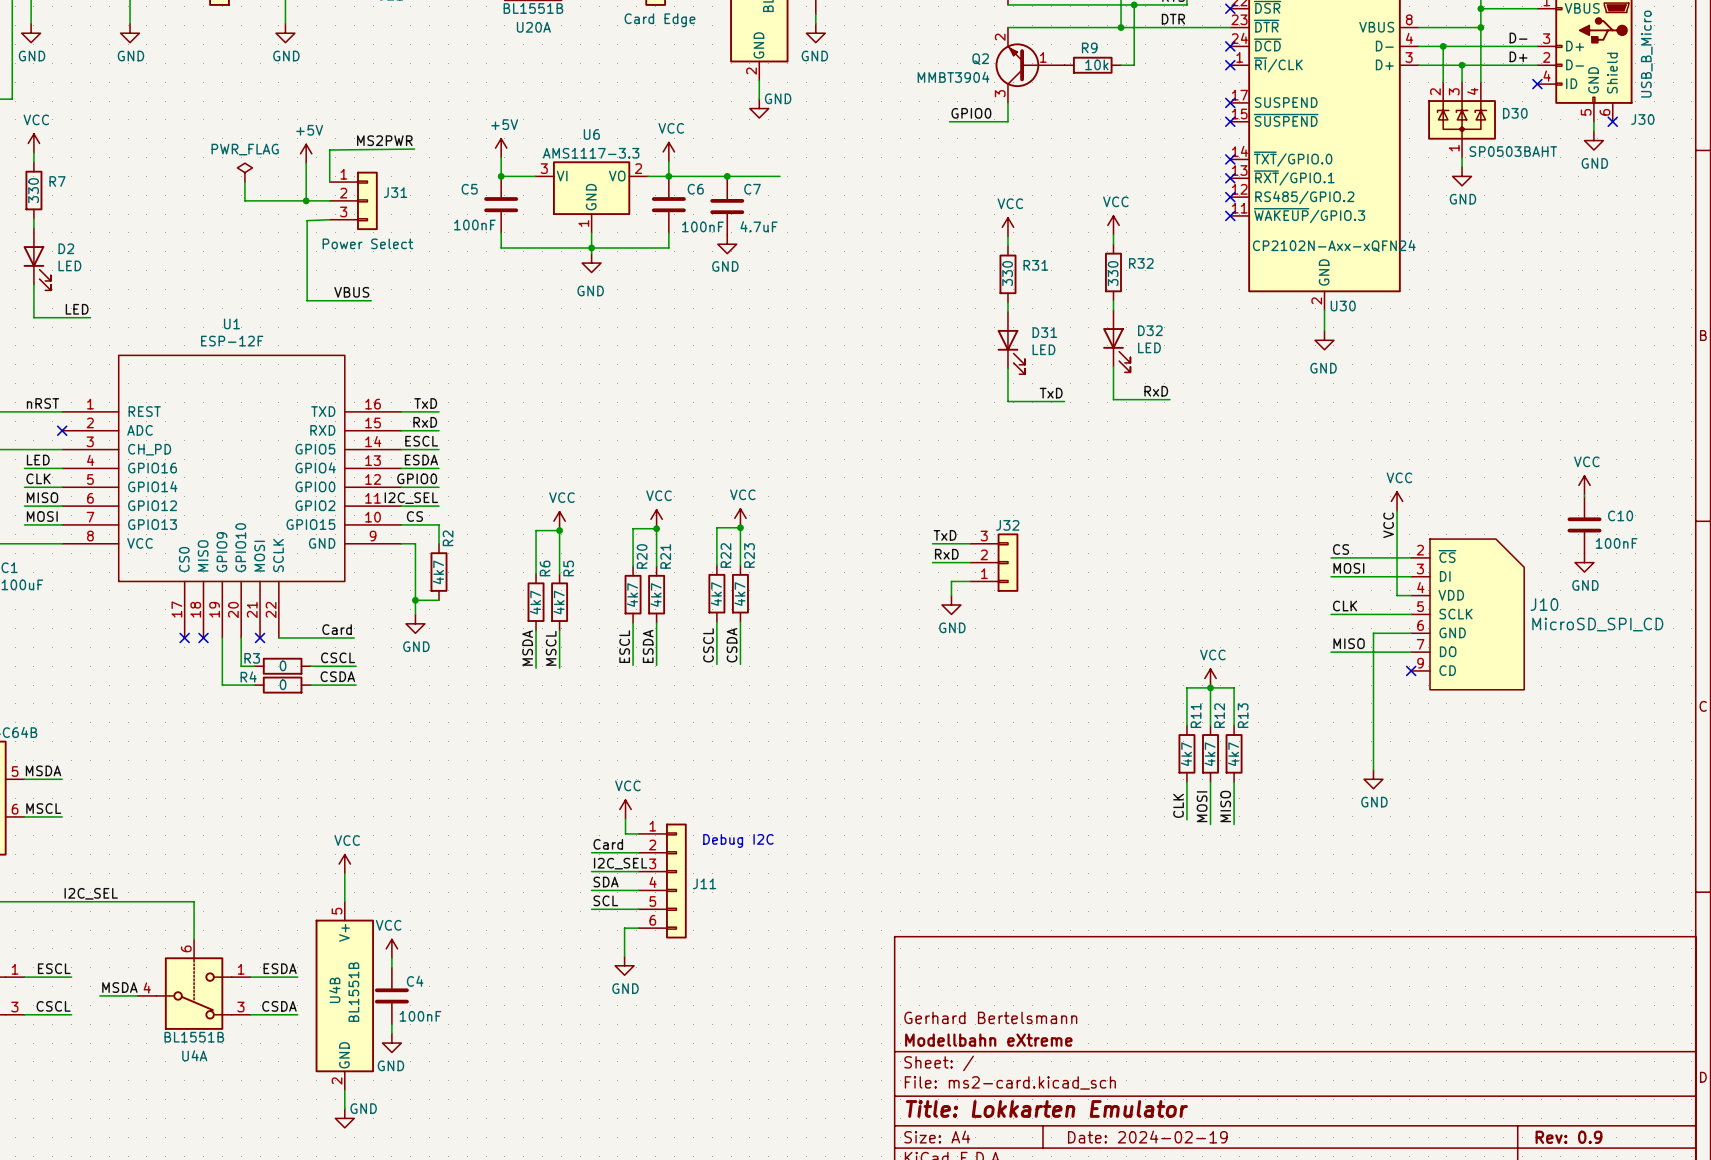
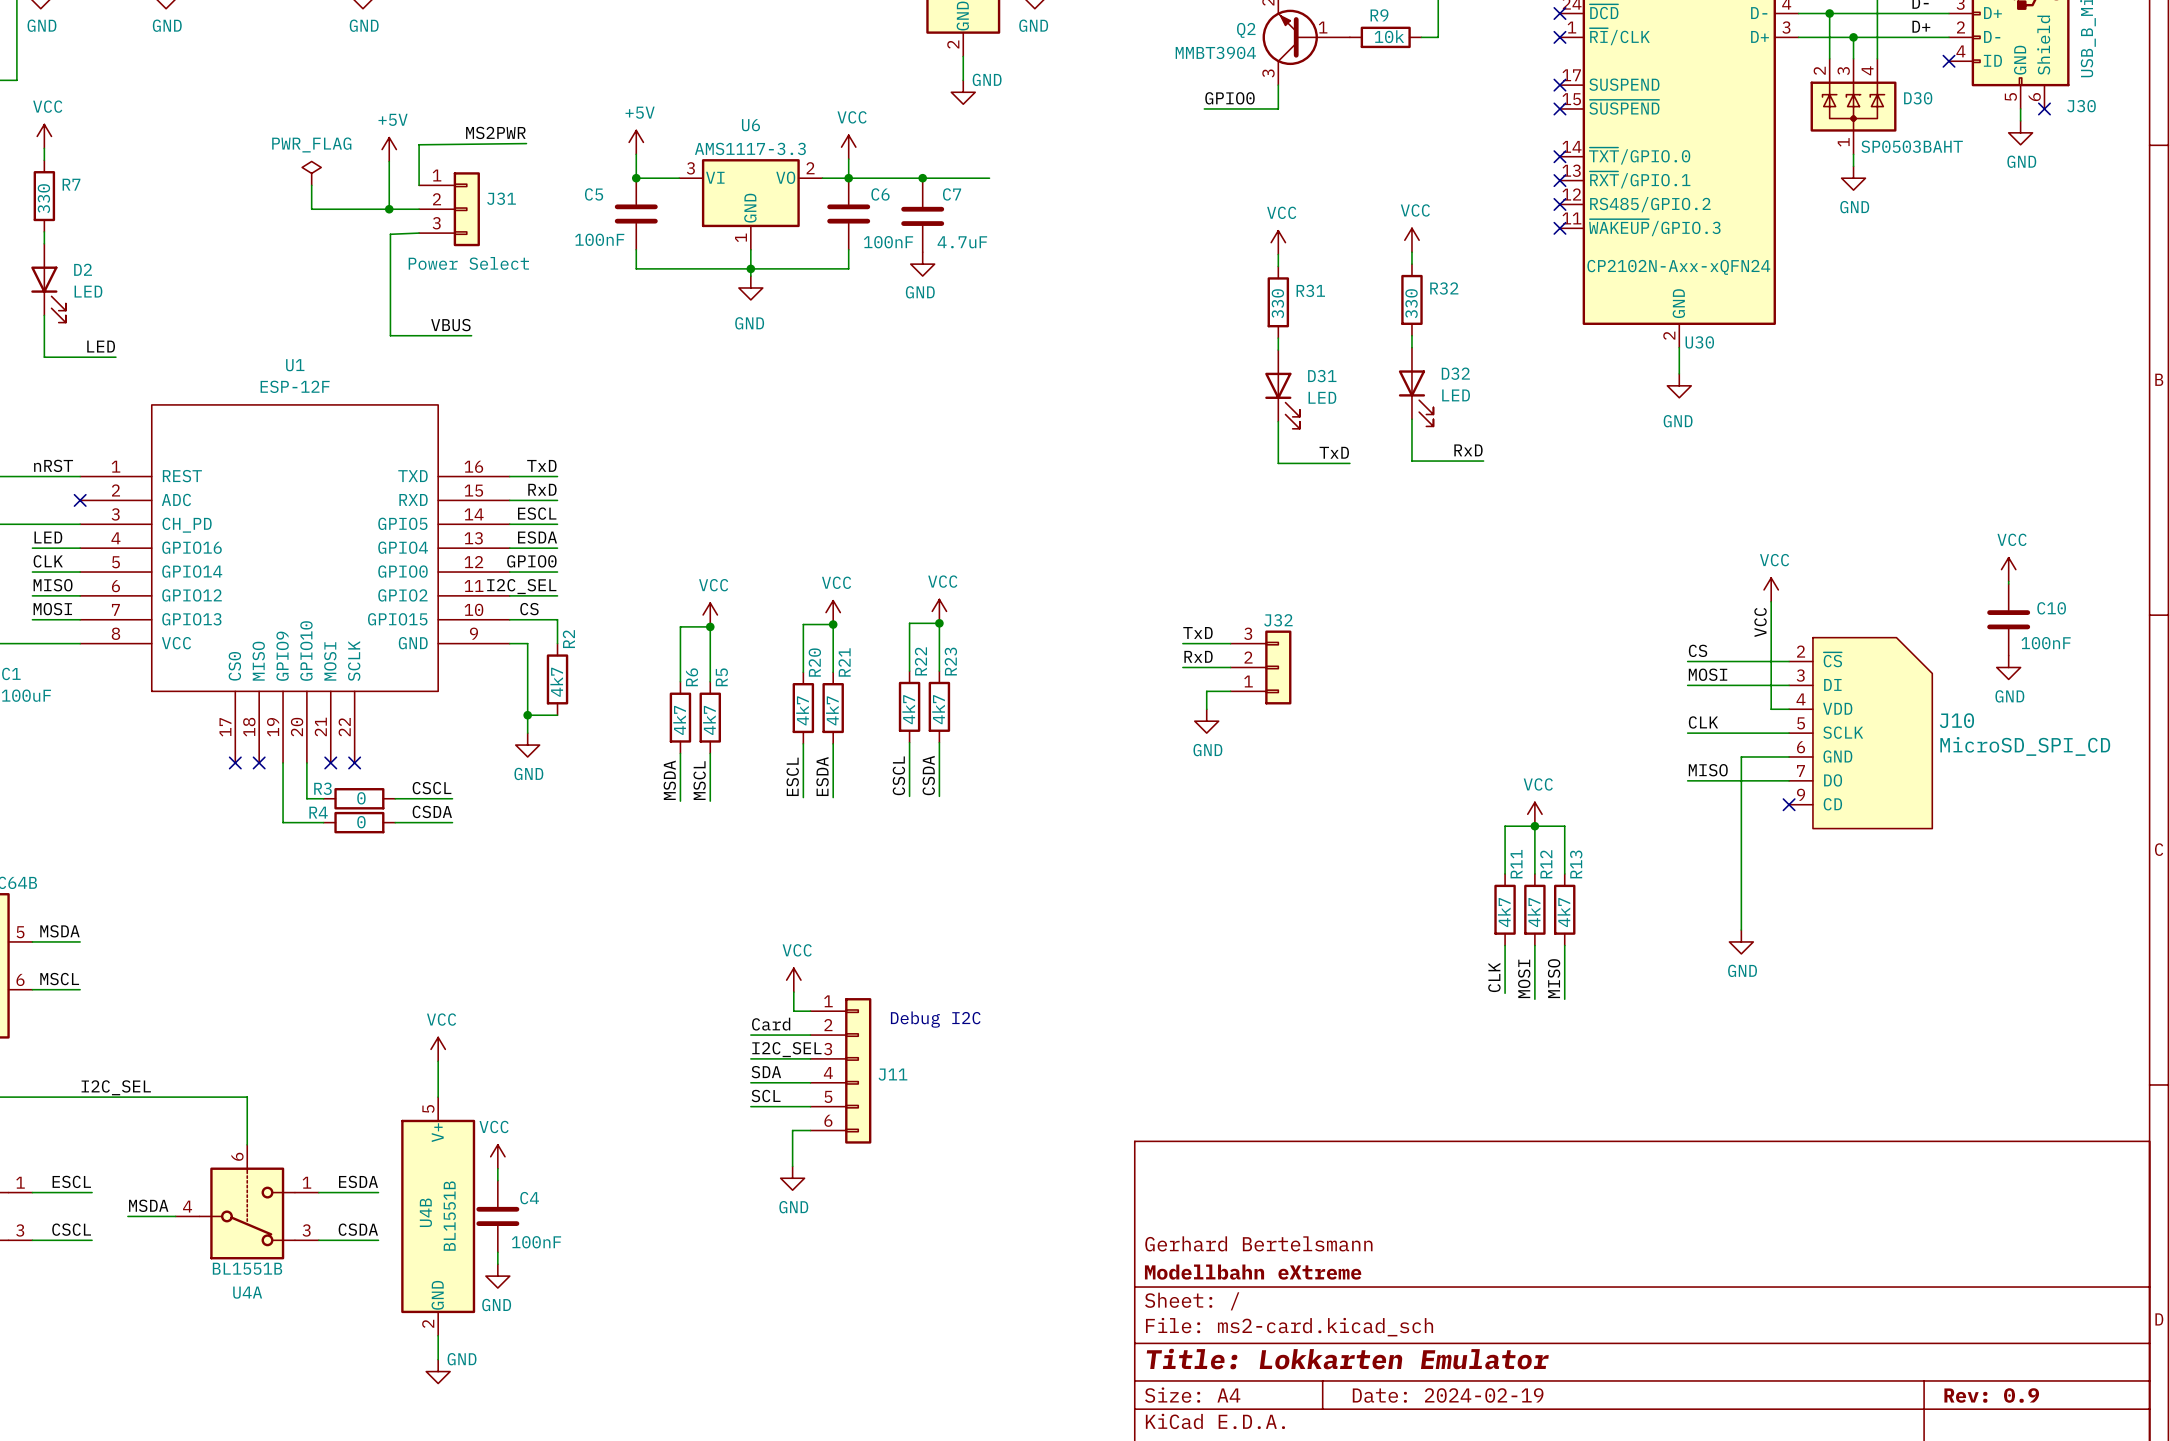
label: Card (337, 629) -> none
wire: (278, 637) (354, 637) -> none
no-connect mark: none -> (354, 762)

